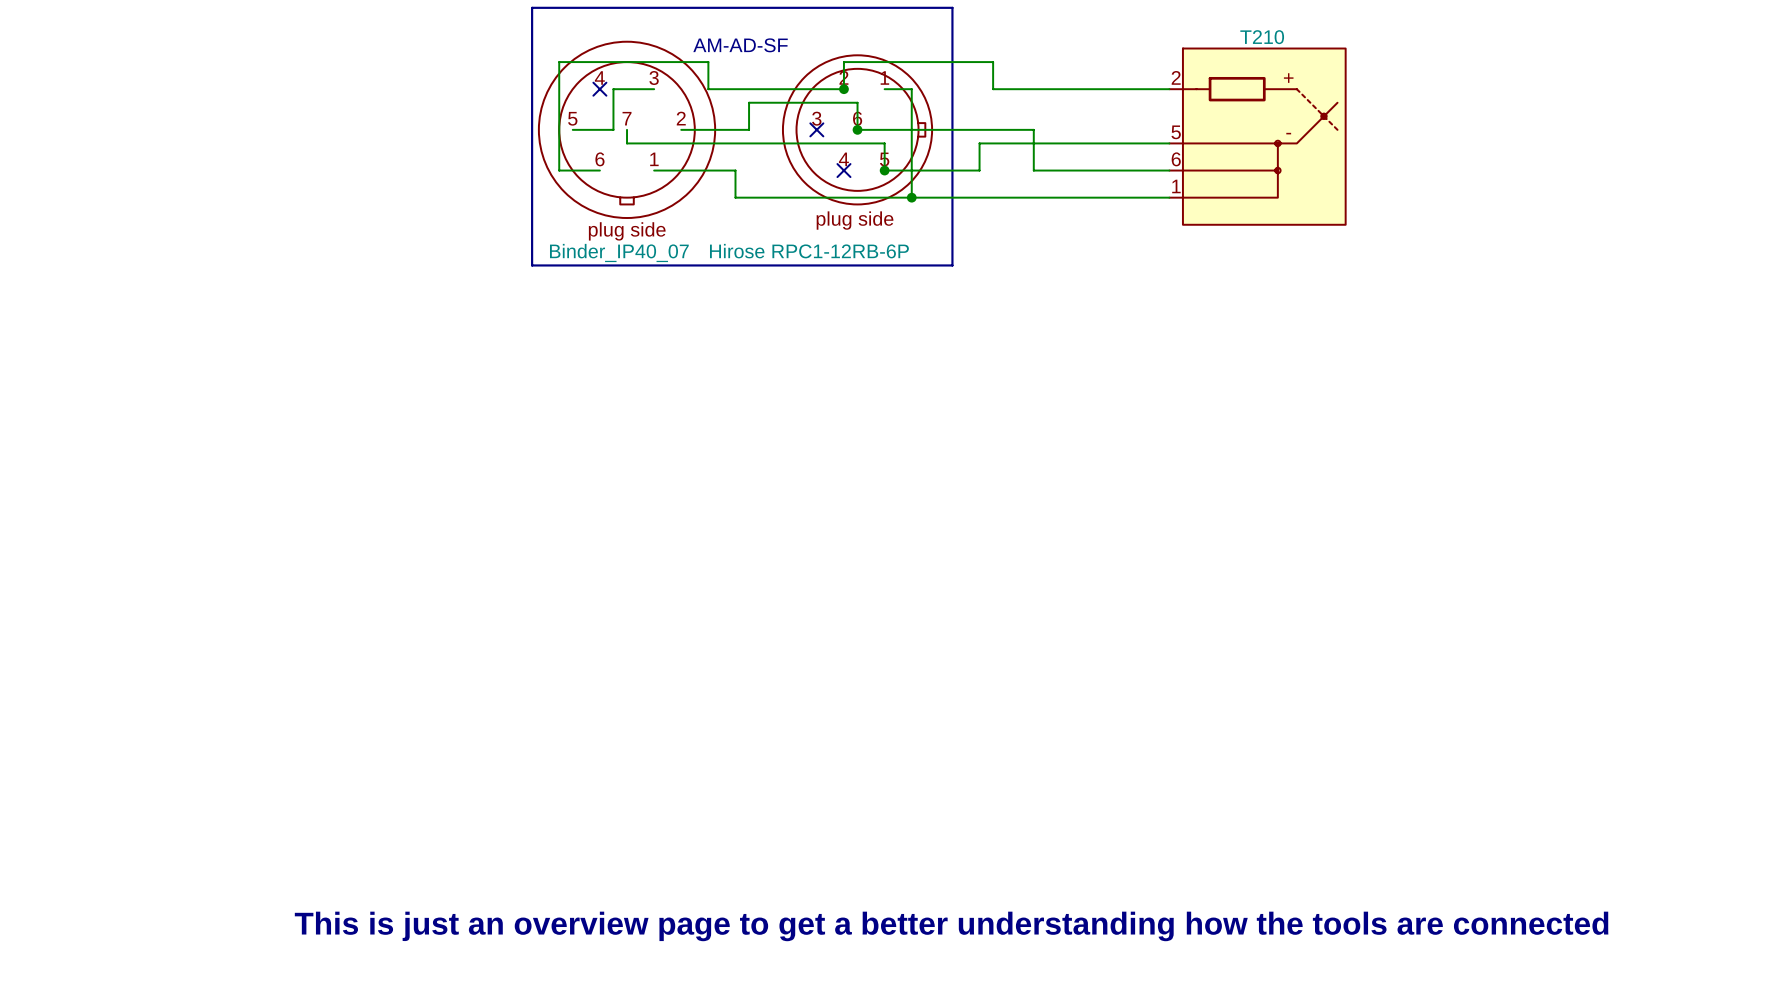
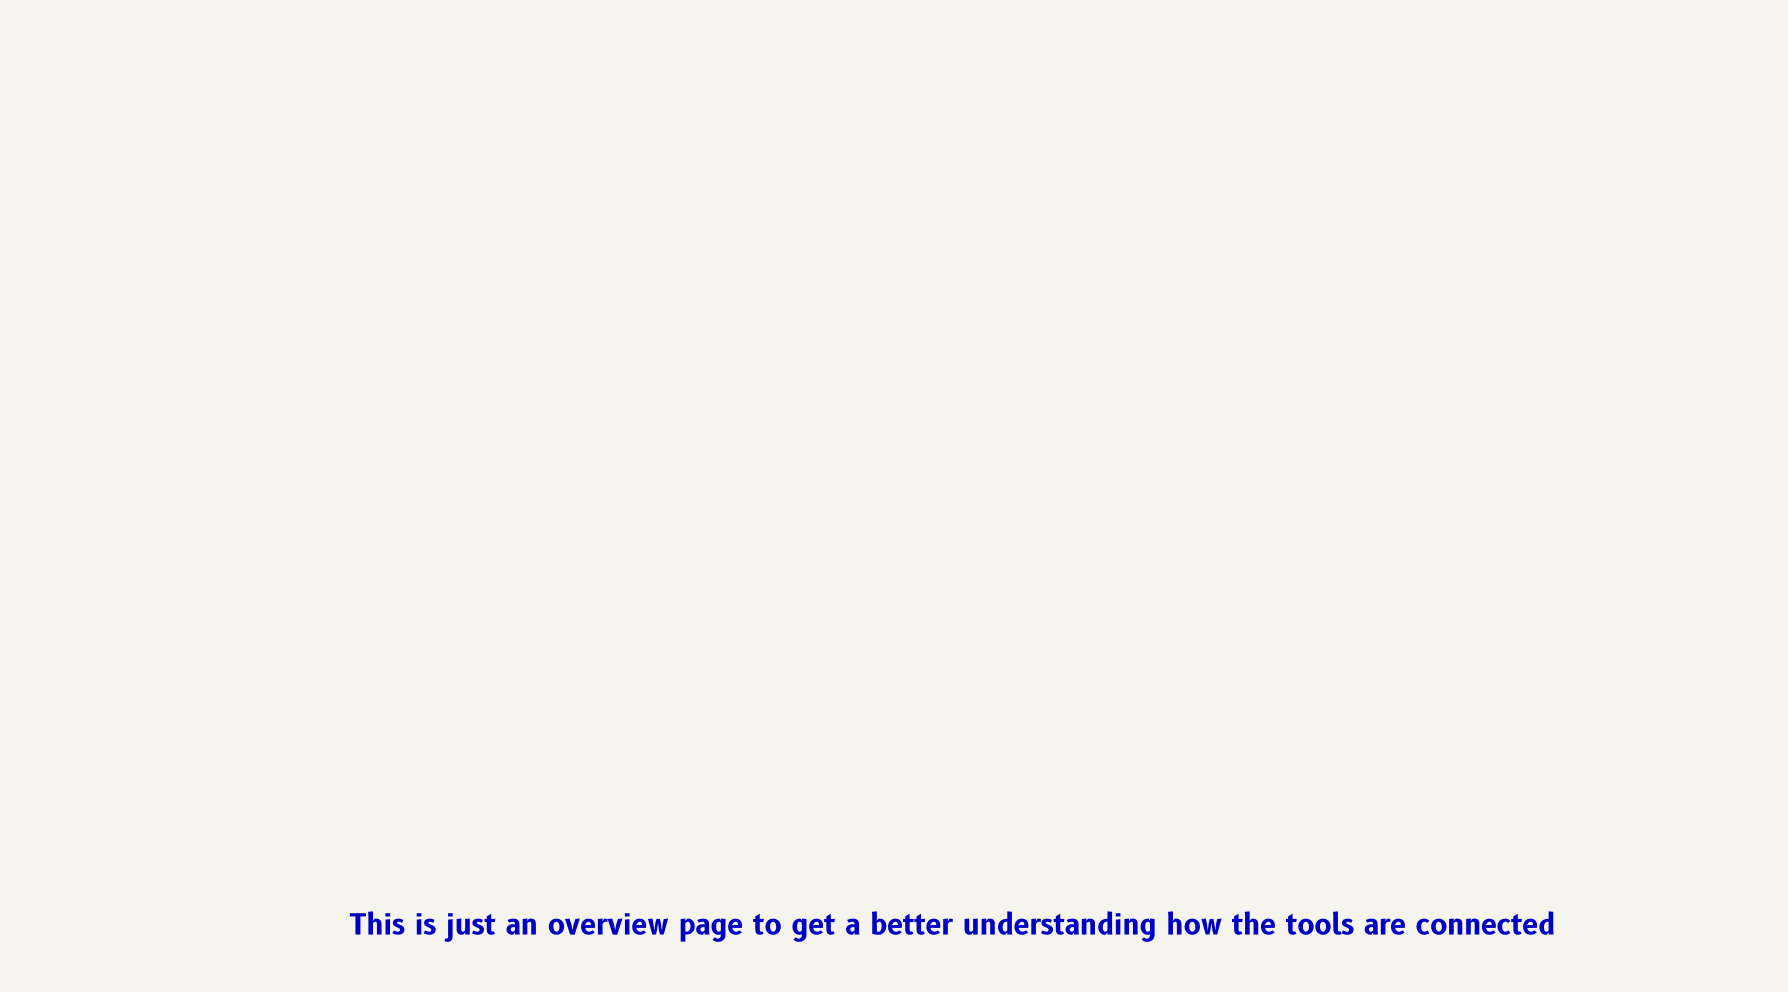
line: (532, 7) (952, 7) (952, 265) (532, 265) (532, 7) -> none
text: AM-AD-SF (740, 45) -> none
no-connect mark: (599, 89) -> none
wire: (654, 89) (613, 89) (613, 129) (572, 129) -> none
junction: (843, 89) -> none
wire: (884, 89) (911, 89) (911, 197) -> none
wire: (1169, 89) (993, 89) (993, 62) (843, 62) (843, 89) (708, 89) (708, 62) (559, 62) (559, 170) (599, 170) -> none
wire: (627, 129) (627, 143) (884, 143) (884, 170) (979, 170) (979, 143) (1169, 143) -> none
part: Binder_IP40_07 (627, 129) -> none
wire: (681, 129) (749, 129) (749, 102) (857, 102) (857, 129) (1033, 129) (1033, 170) (1169, 170) -> none
no-connect mark: (816, 129) -> none
junction: (857, 129) -> none
part: Hirose RPC1-12RB-6P (857, 129) -> none
part: T210 (1257, 136) -> none
wire: (654, 170) (735, 170) (735, 197) (1169, 197) -> none
no-connect mark: (843, 170) -> none
junction: (884, 170) -> none
junction: (911, 197) -> none

